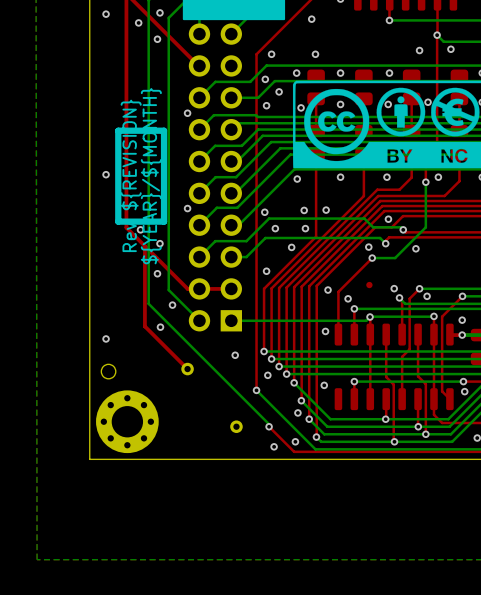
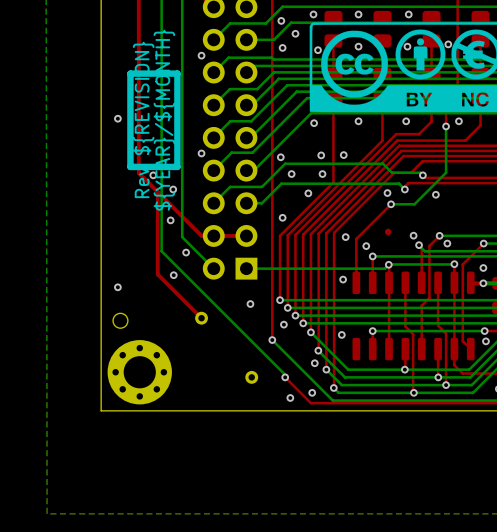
via: (388, 219) -> none

